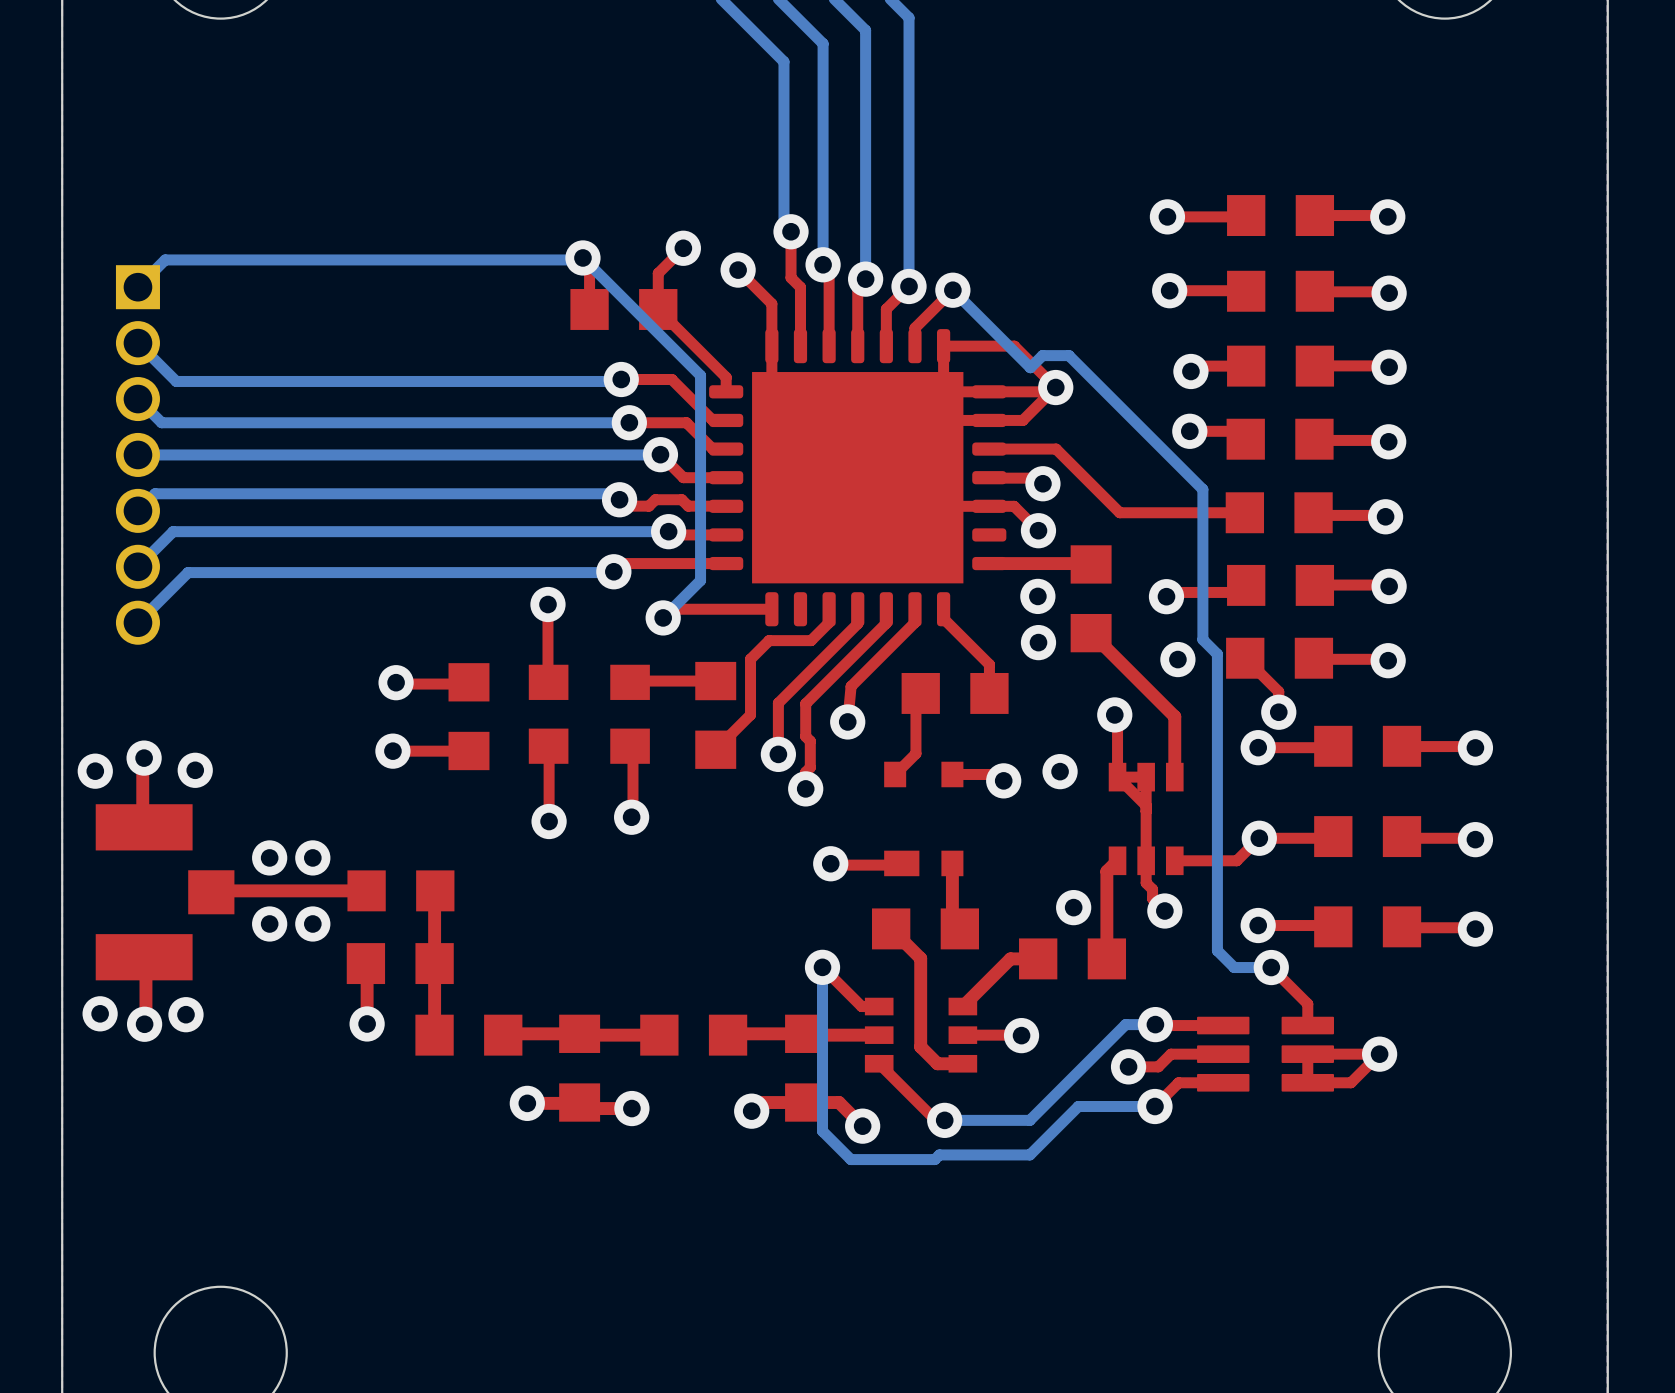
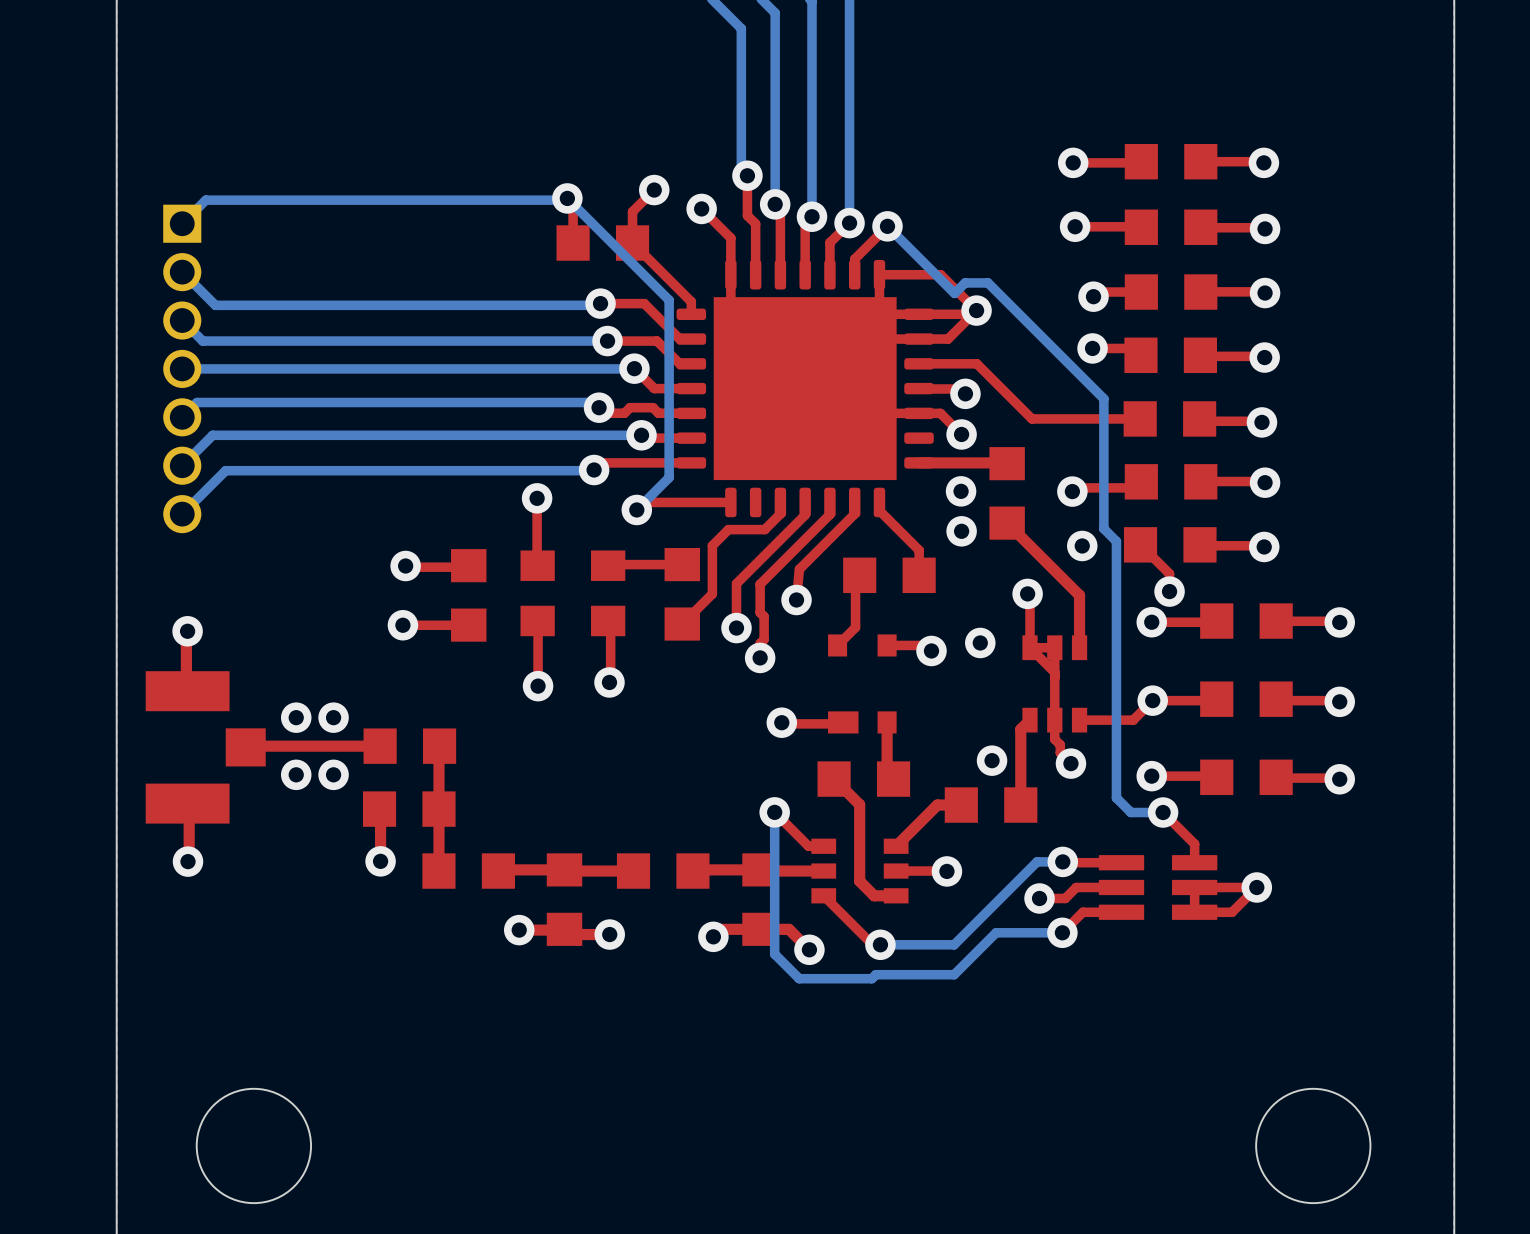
via: (195, 770) -> none
via: (95, 771) -> none
via: (100, 1013) -> none
via: (185, 1014) -> none

